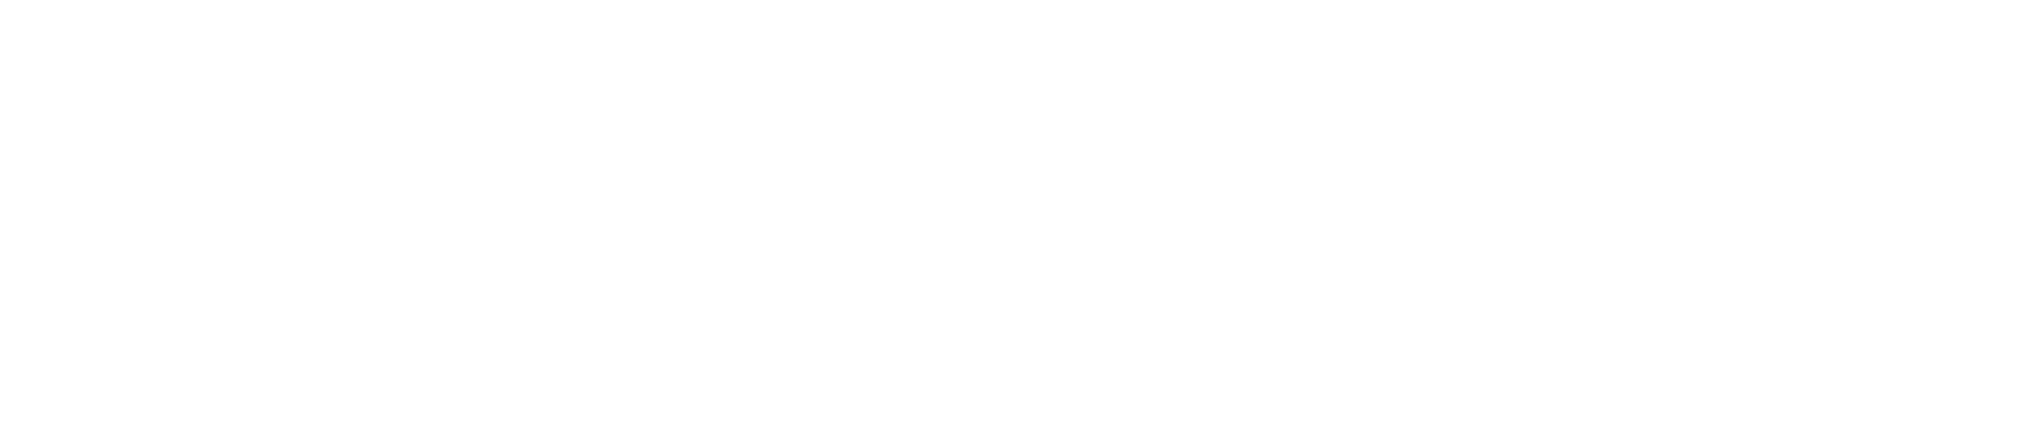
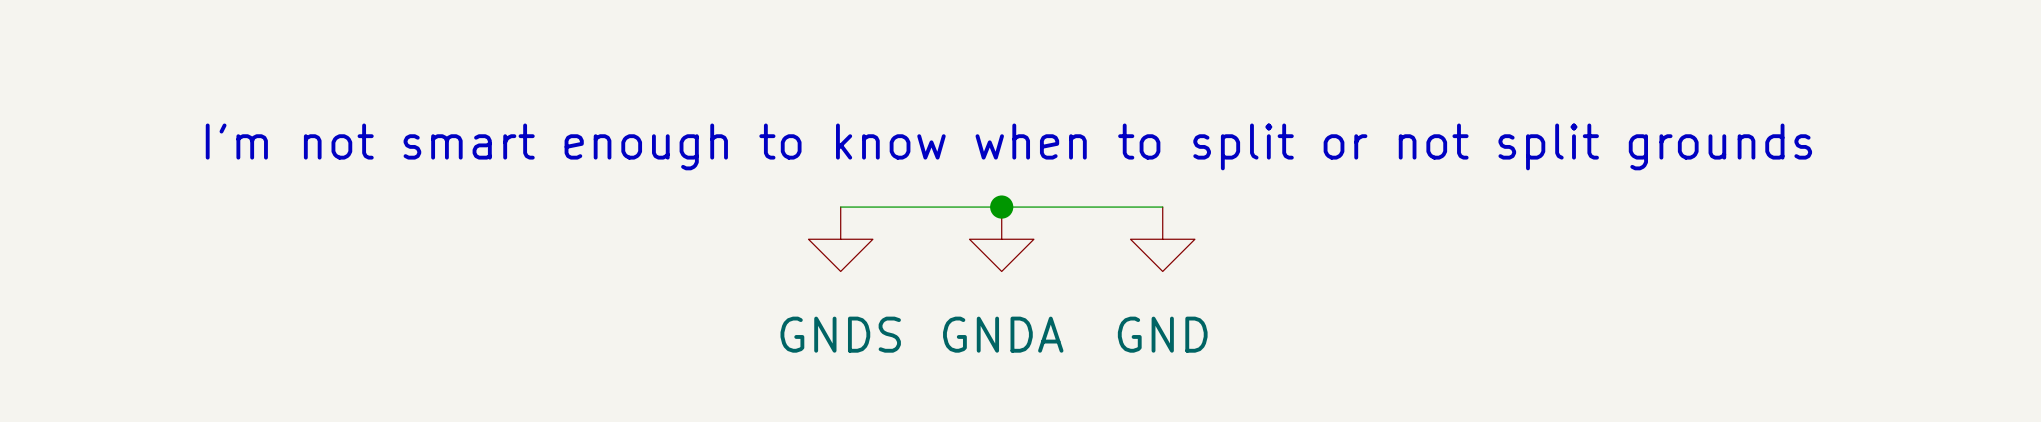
text: none -> I'm not smart enough to know when to split or not split grounds (1008, 146)
wire: none -> (840, 207) (1162, 207)
junction: none -> (1001, 207)
power symbol: none -> GNDS (840, 239)
power symbol: none -> GNDA (1001, 239)
power symbol: none -> GND (1162, 239)

